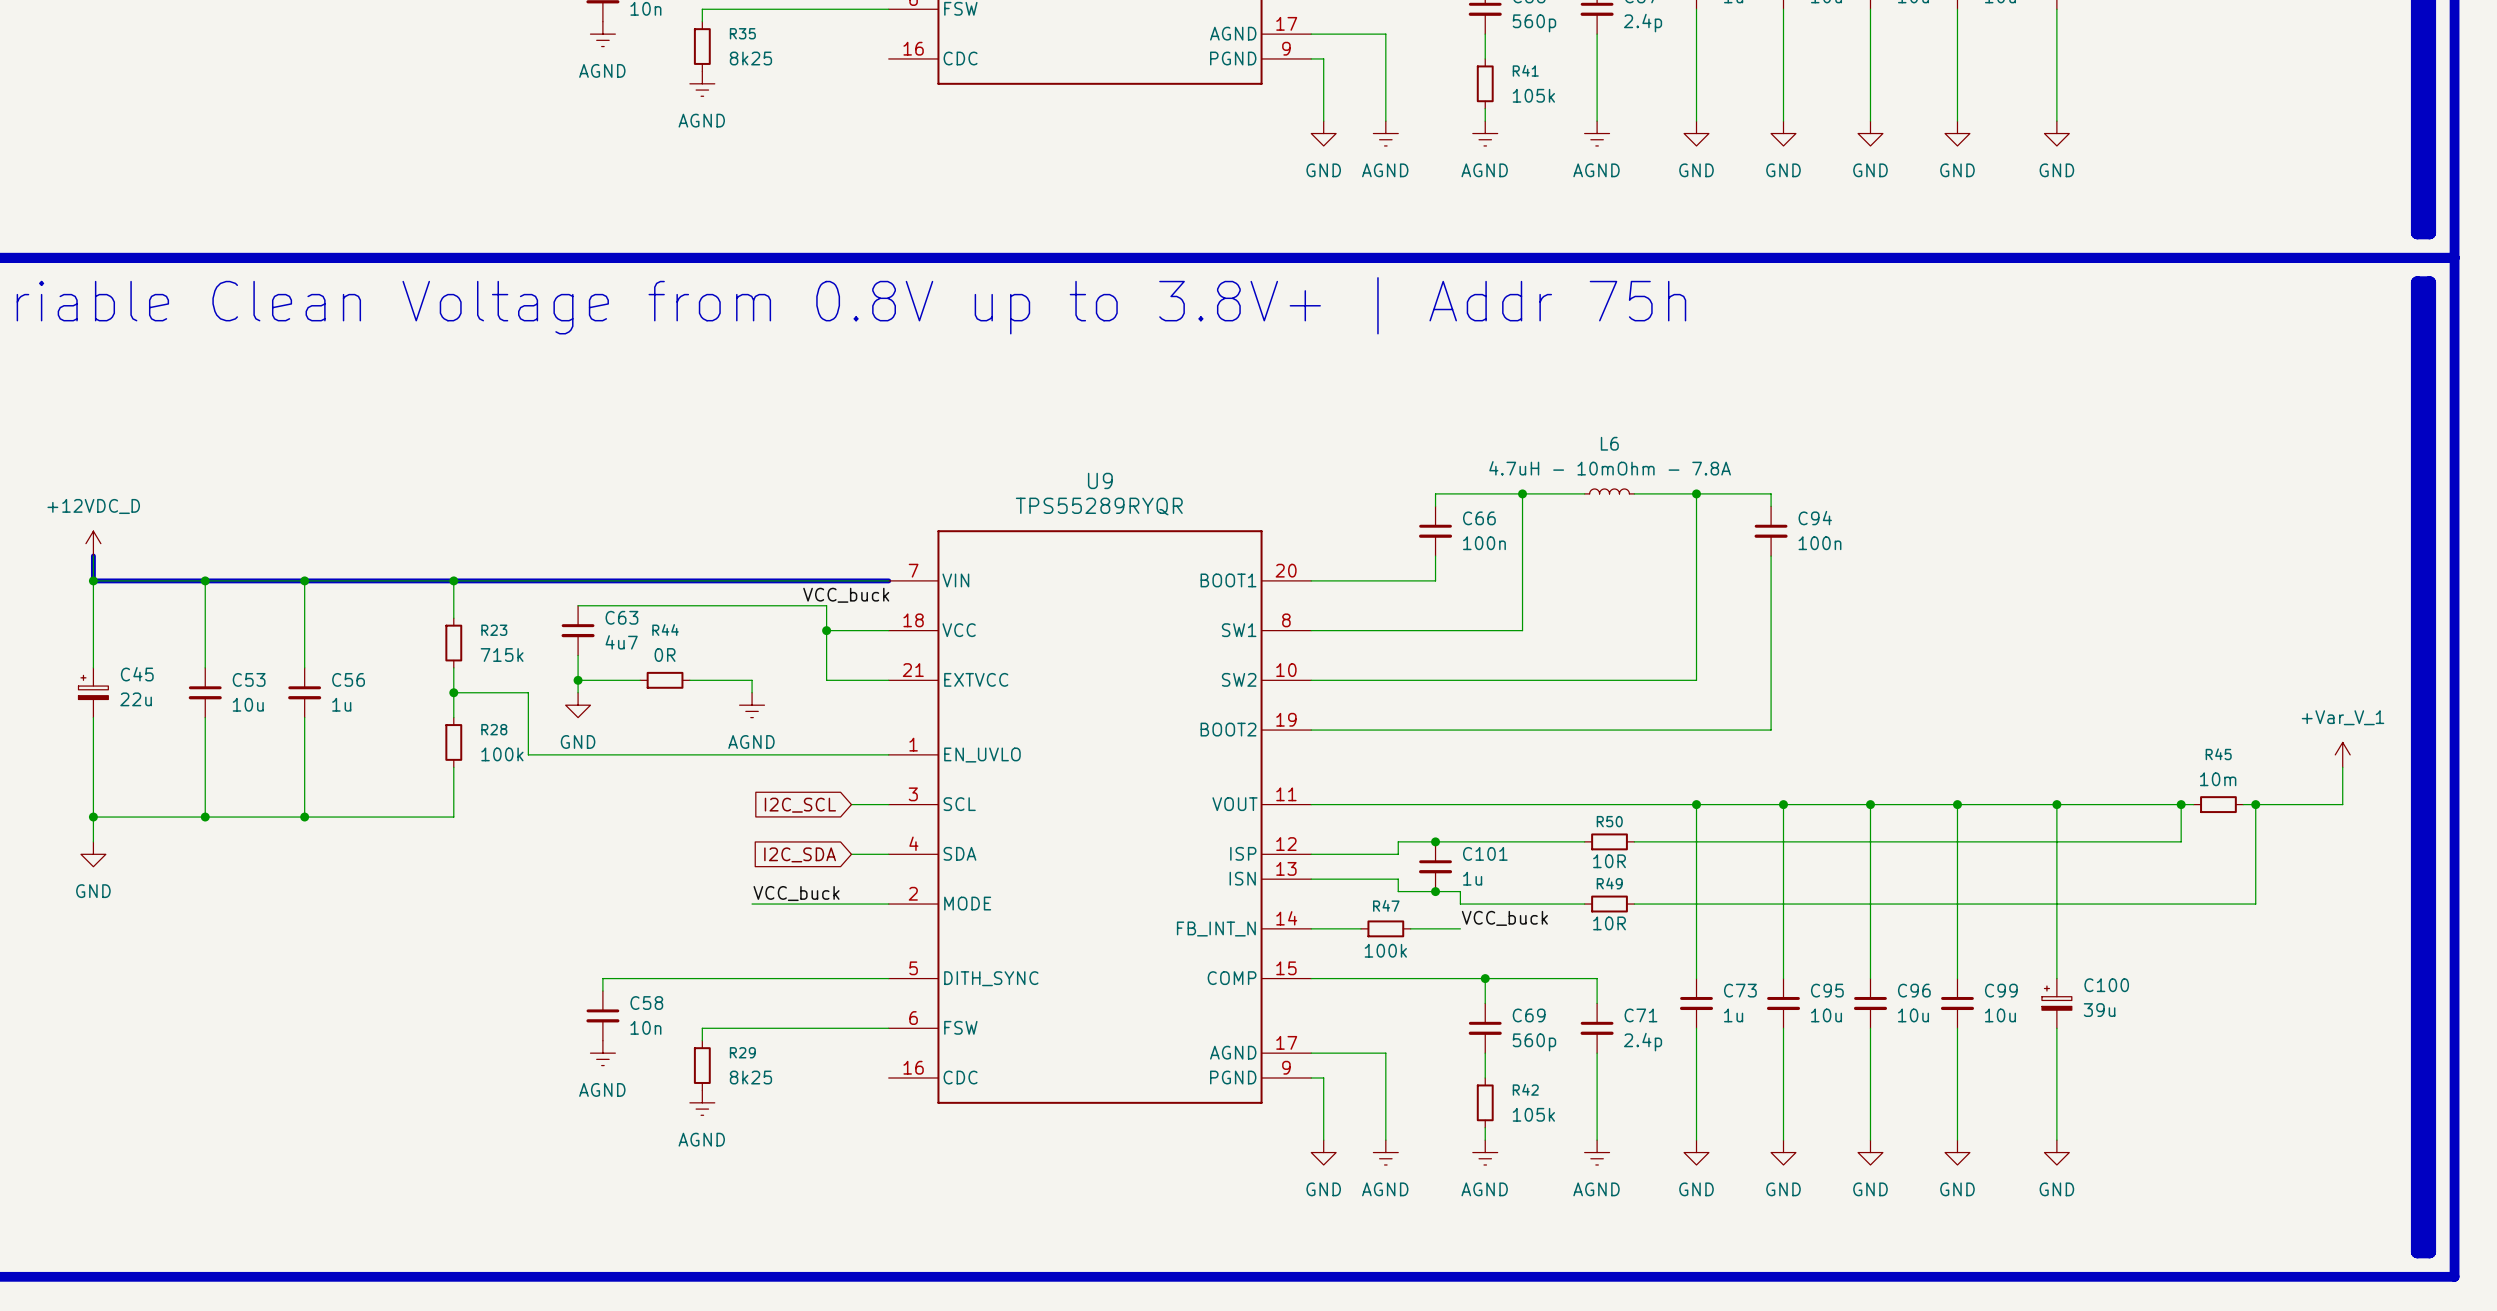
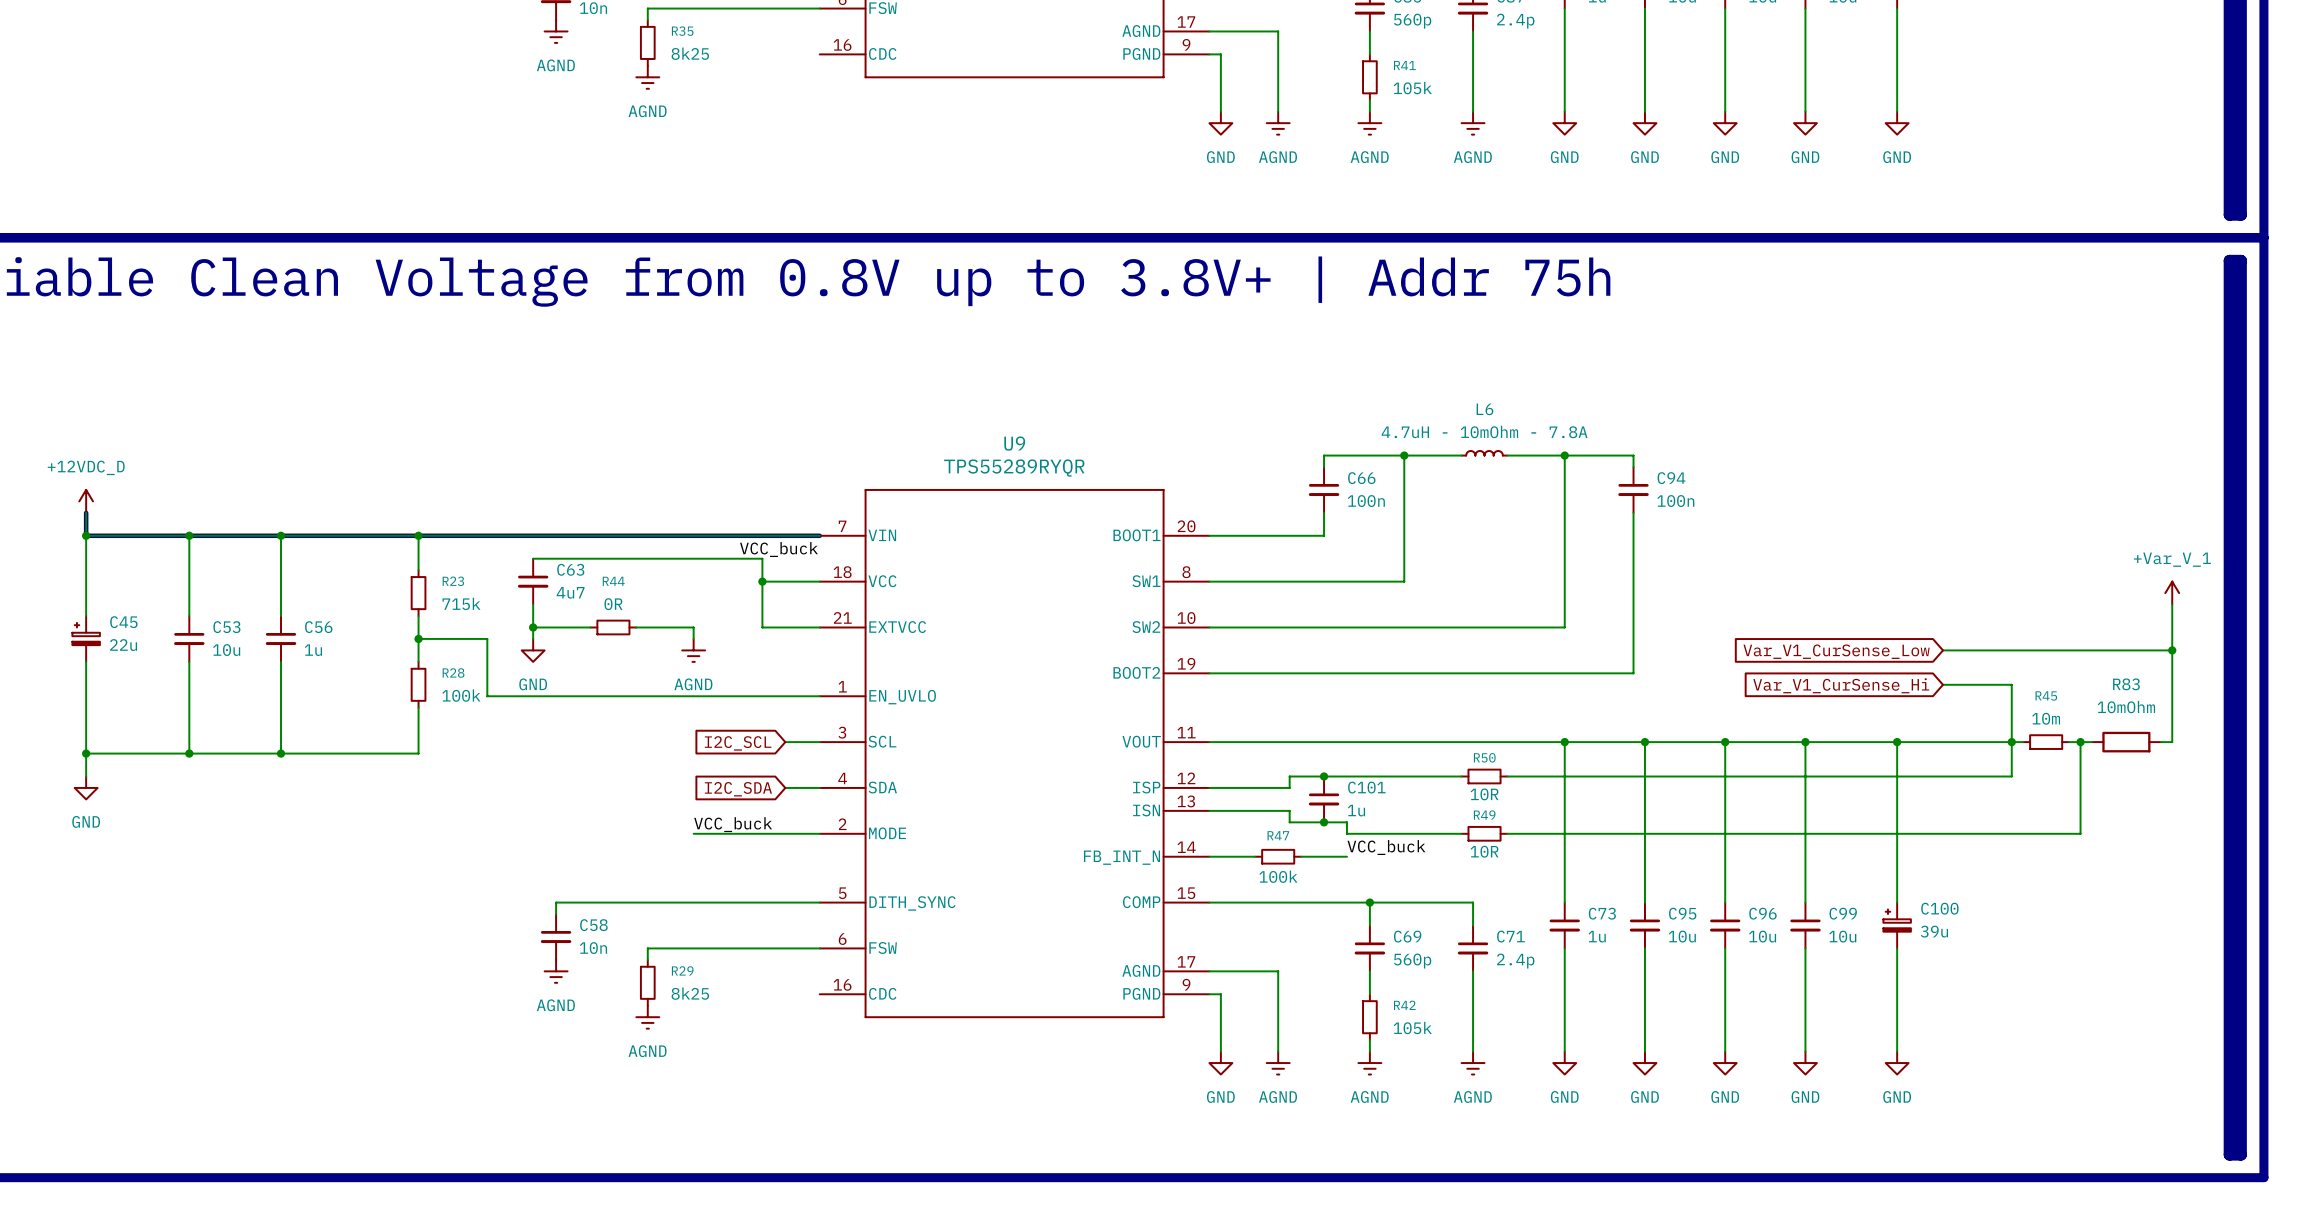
wire: none -> (2172, 604) (2172, 742) (2160, 742)
global label: none -> Var_V1_CurSense_Low (1836, 651)
wire: none -> (1942, 650) (2172, 650)
junction: none -> (2172, 650)
wire: none -> (1942, 684) (2011, 684) (2011, 742)
global label: none -> Var_V1_CurSense_Hi (1841, 685)
power symbol position: +Var_V_1 (2342, 754) -> +Var_V_1 (2172, 593)
wire: (2342, 767) (2342, 804) (2268, 804) -> none
R83: none -> 10mOhm (2126, 742)

